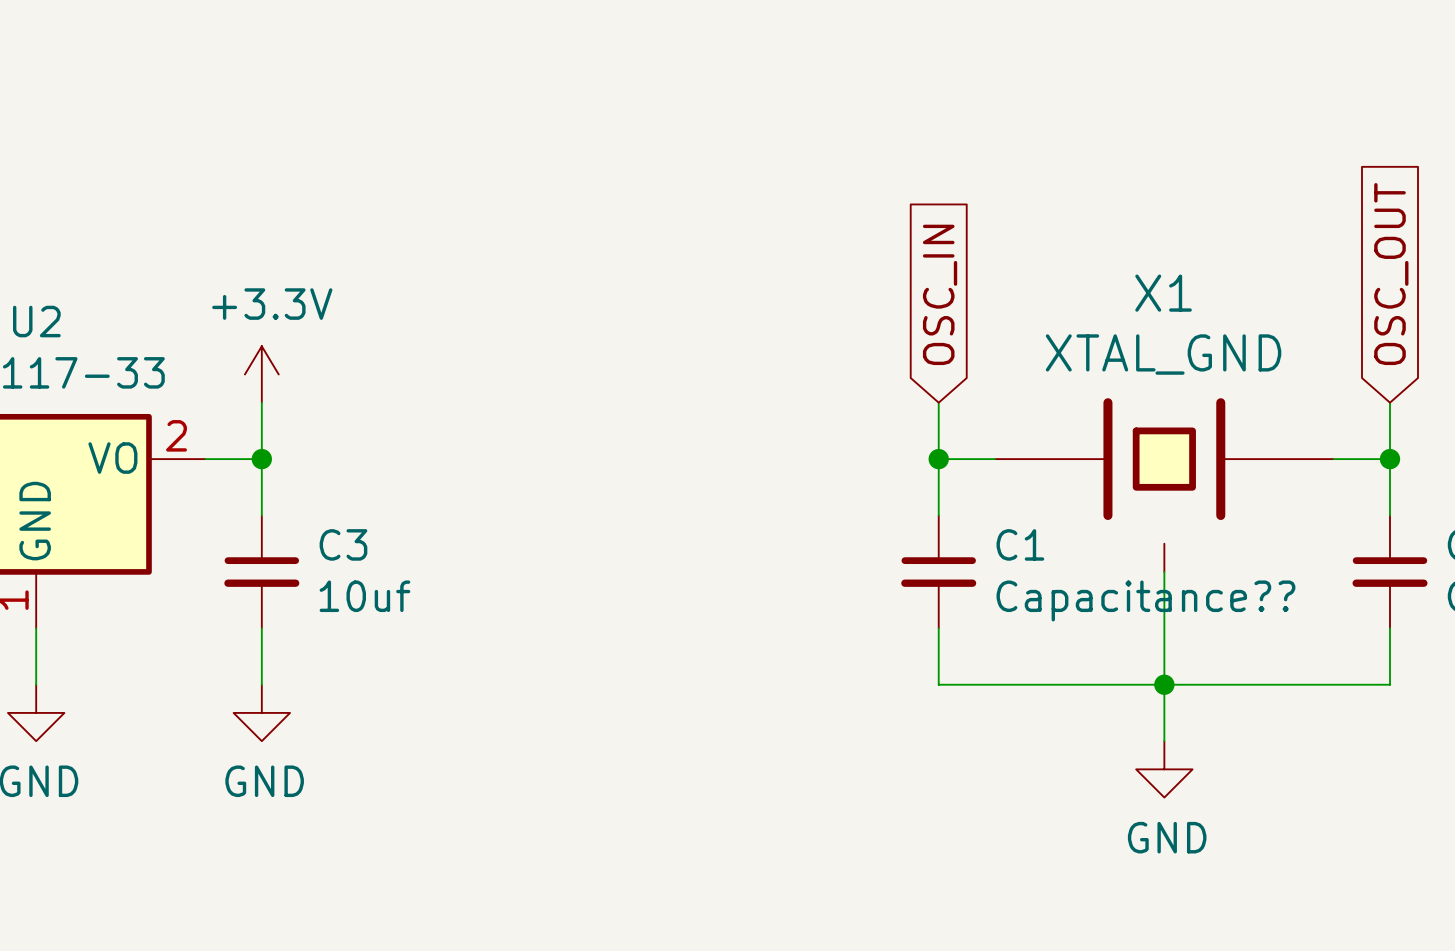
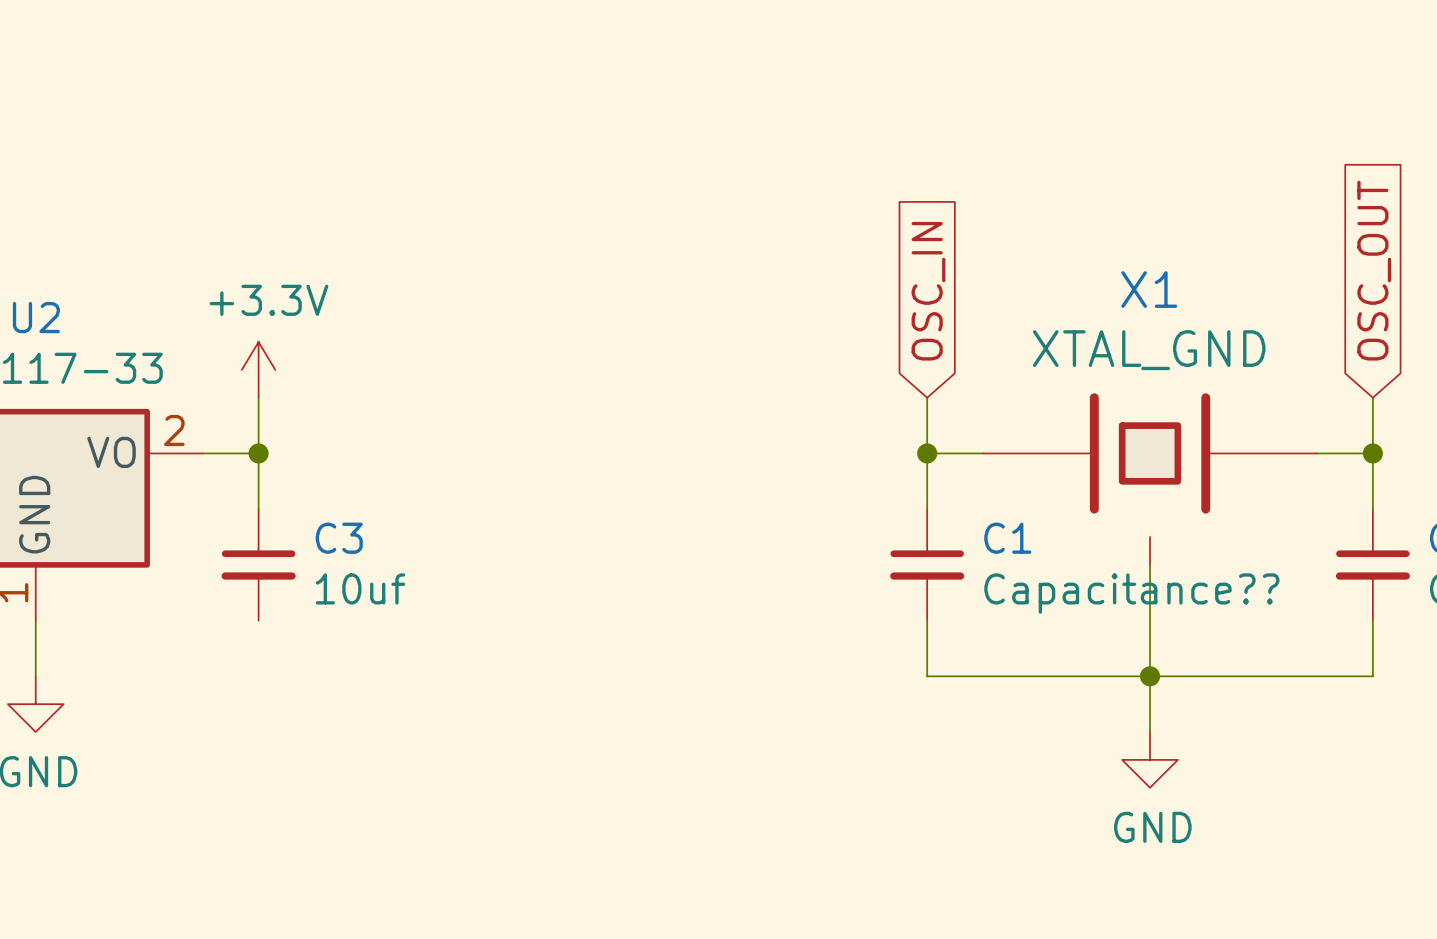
wire: (261, 628) (261, 684) -> none
power symbol: GND (261, 712) -> none

